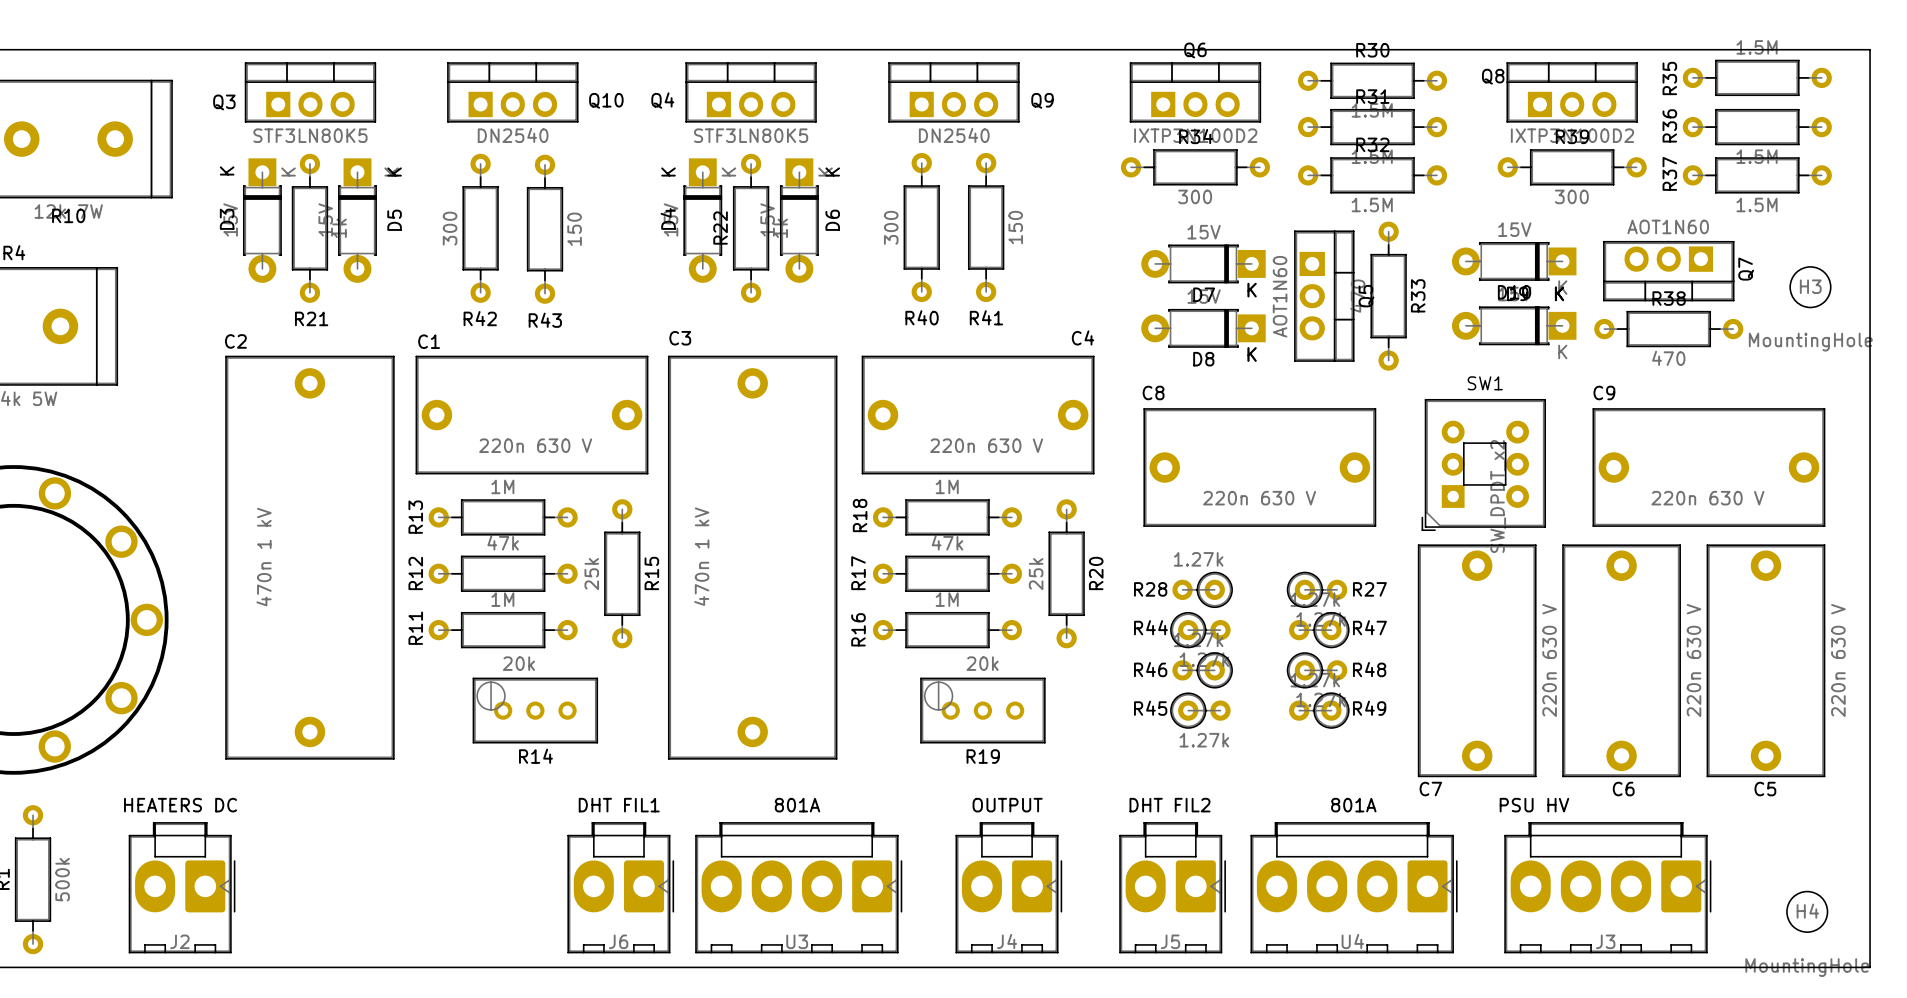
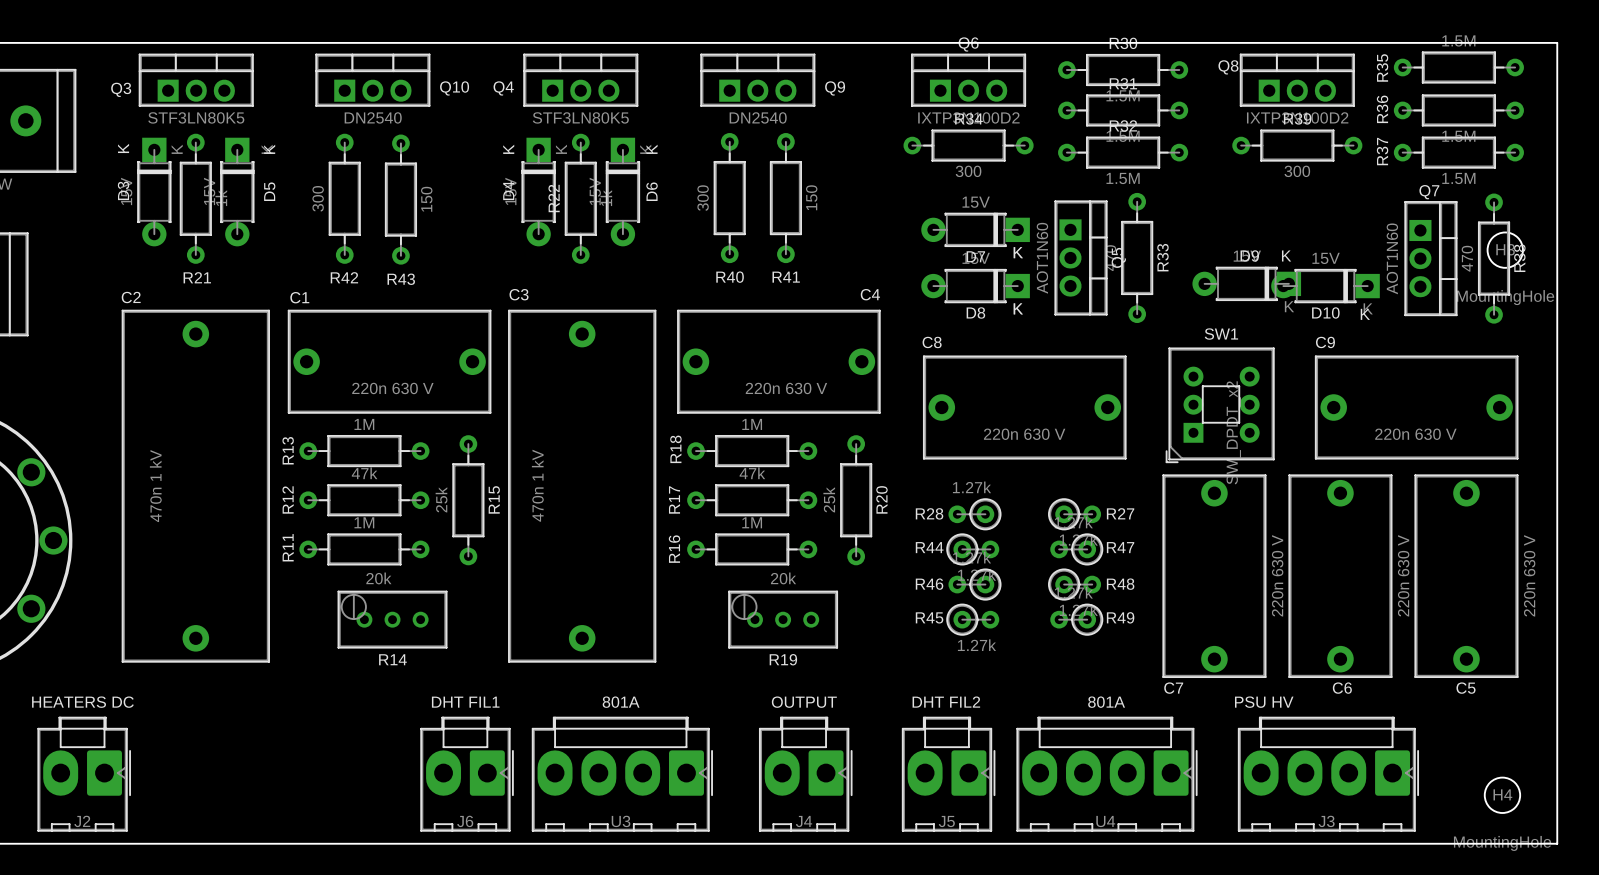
D10 position: (1514, 261) -> (1325, 286)
Q7 rotation: 0° (1668, 271) -> 90° counterclockwise (1430, 258)
R38 rotation: 0° (1668, 329) -> 90° clockwise (1494, 258)
R38 position: (1668, 329) -> (1494, 258)

